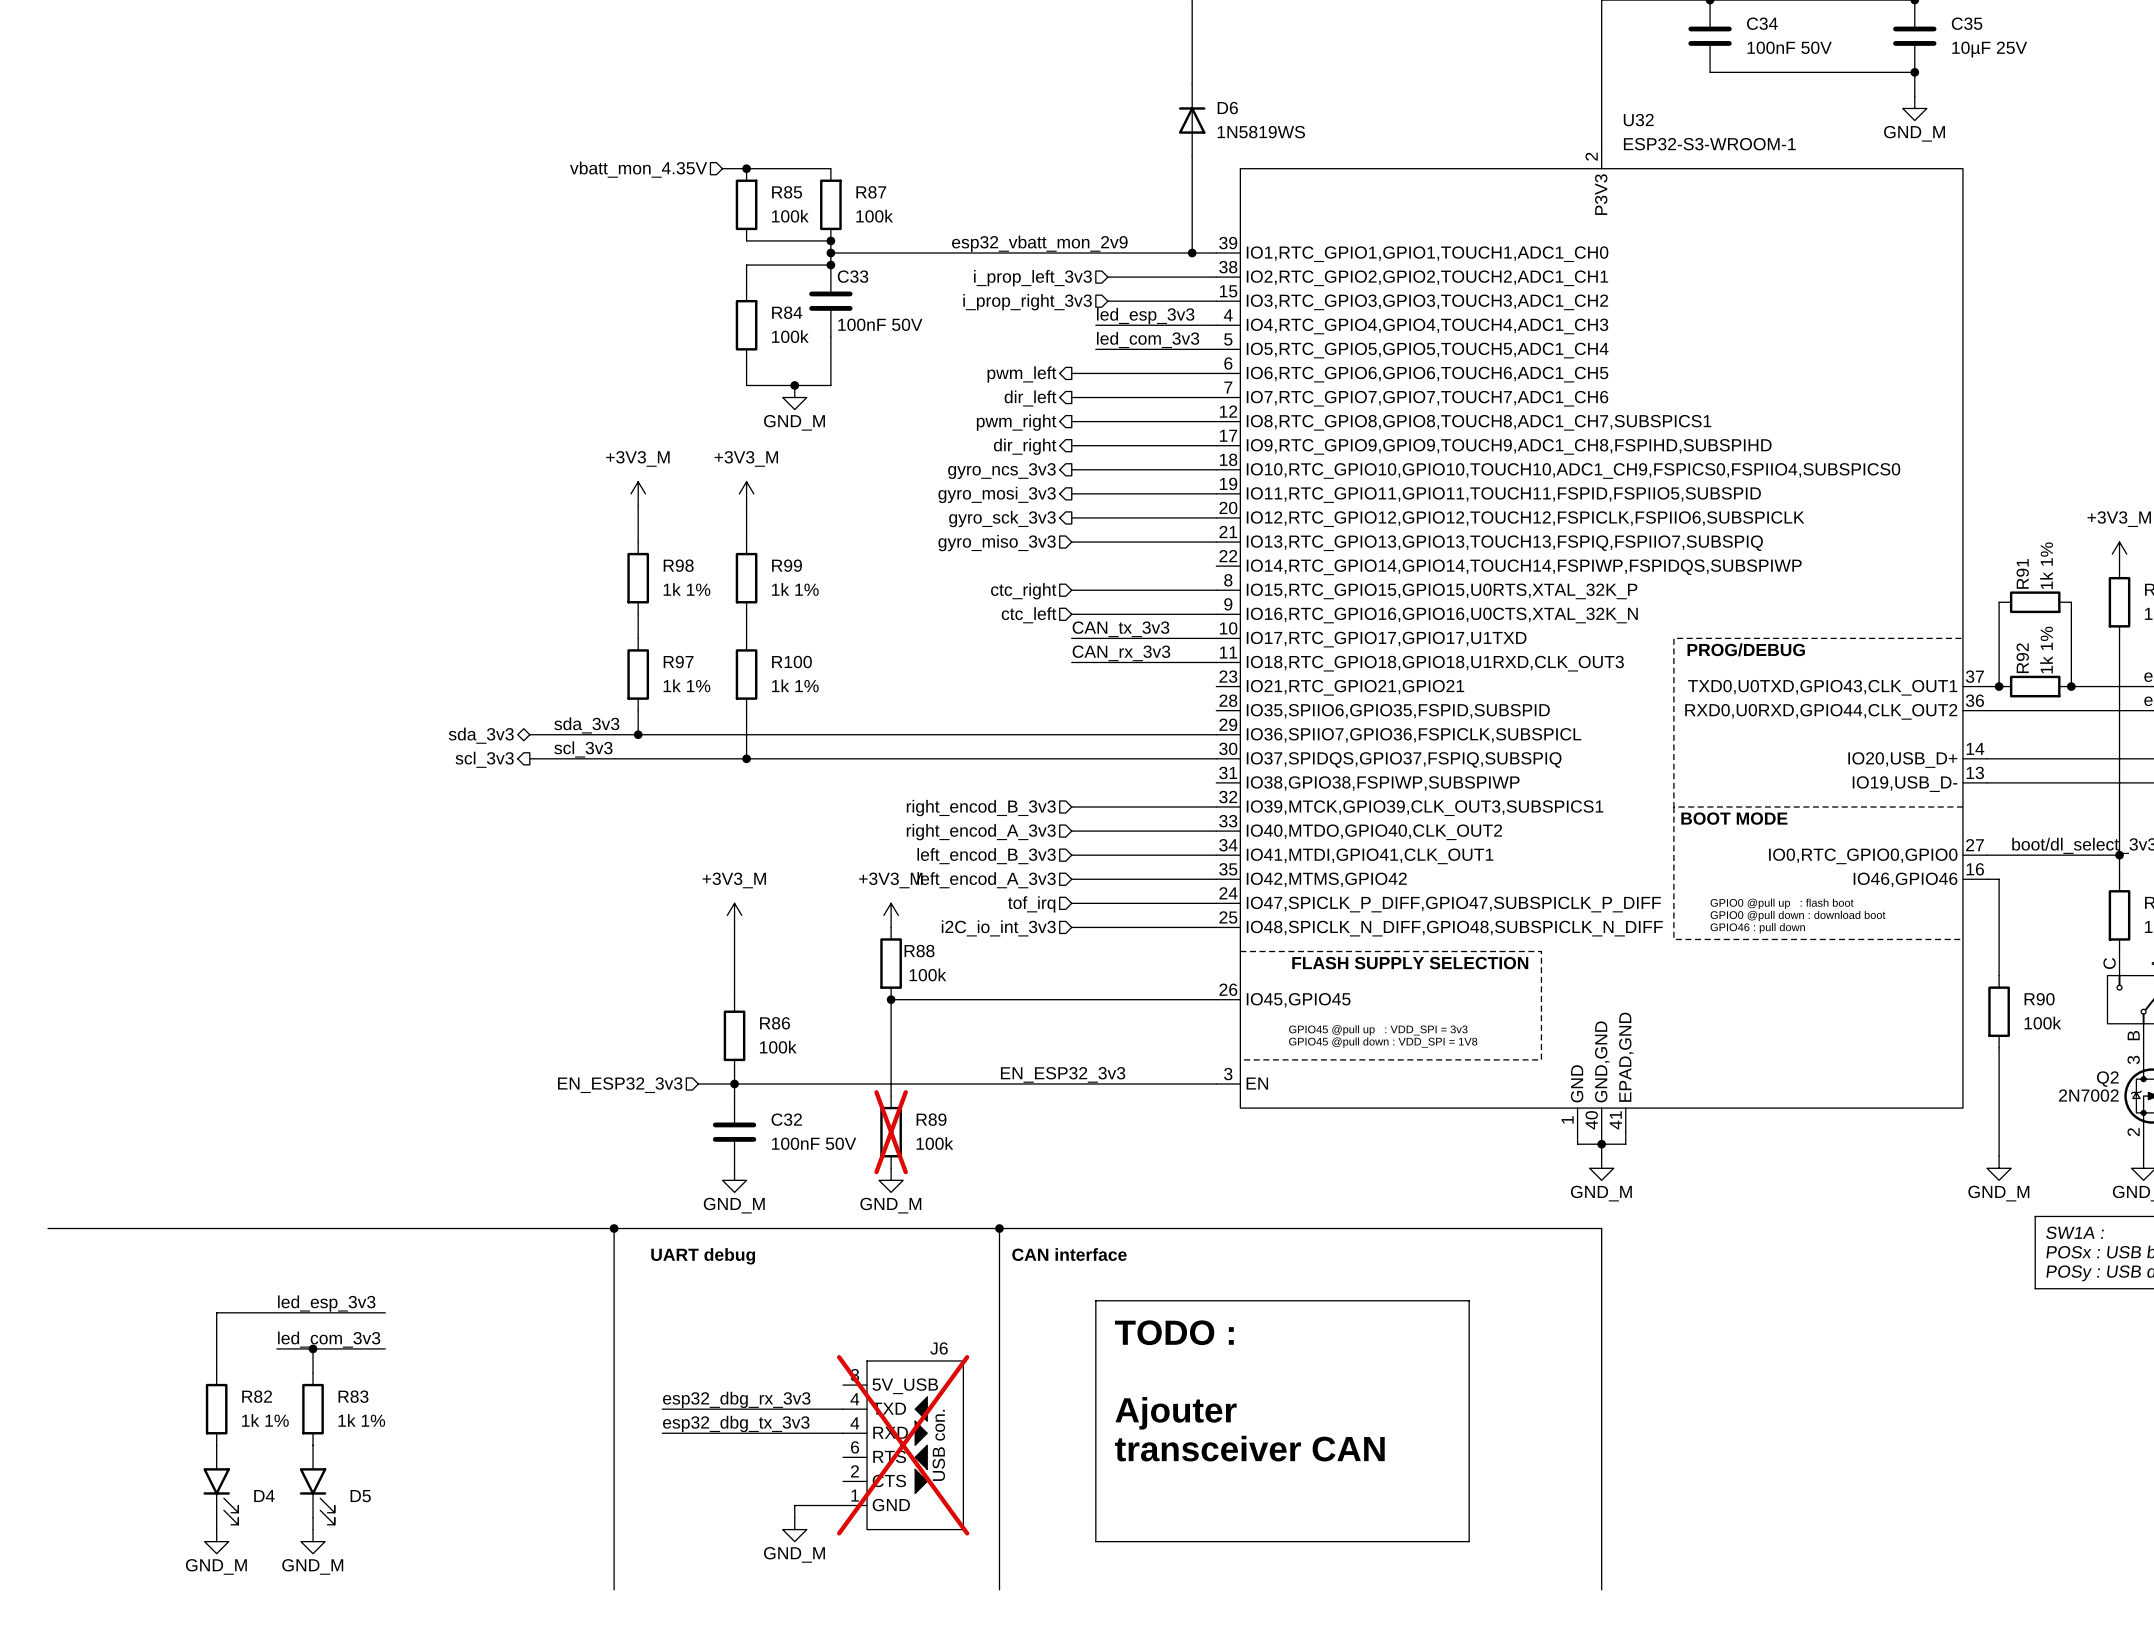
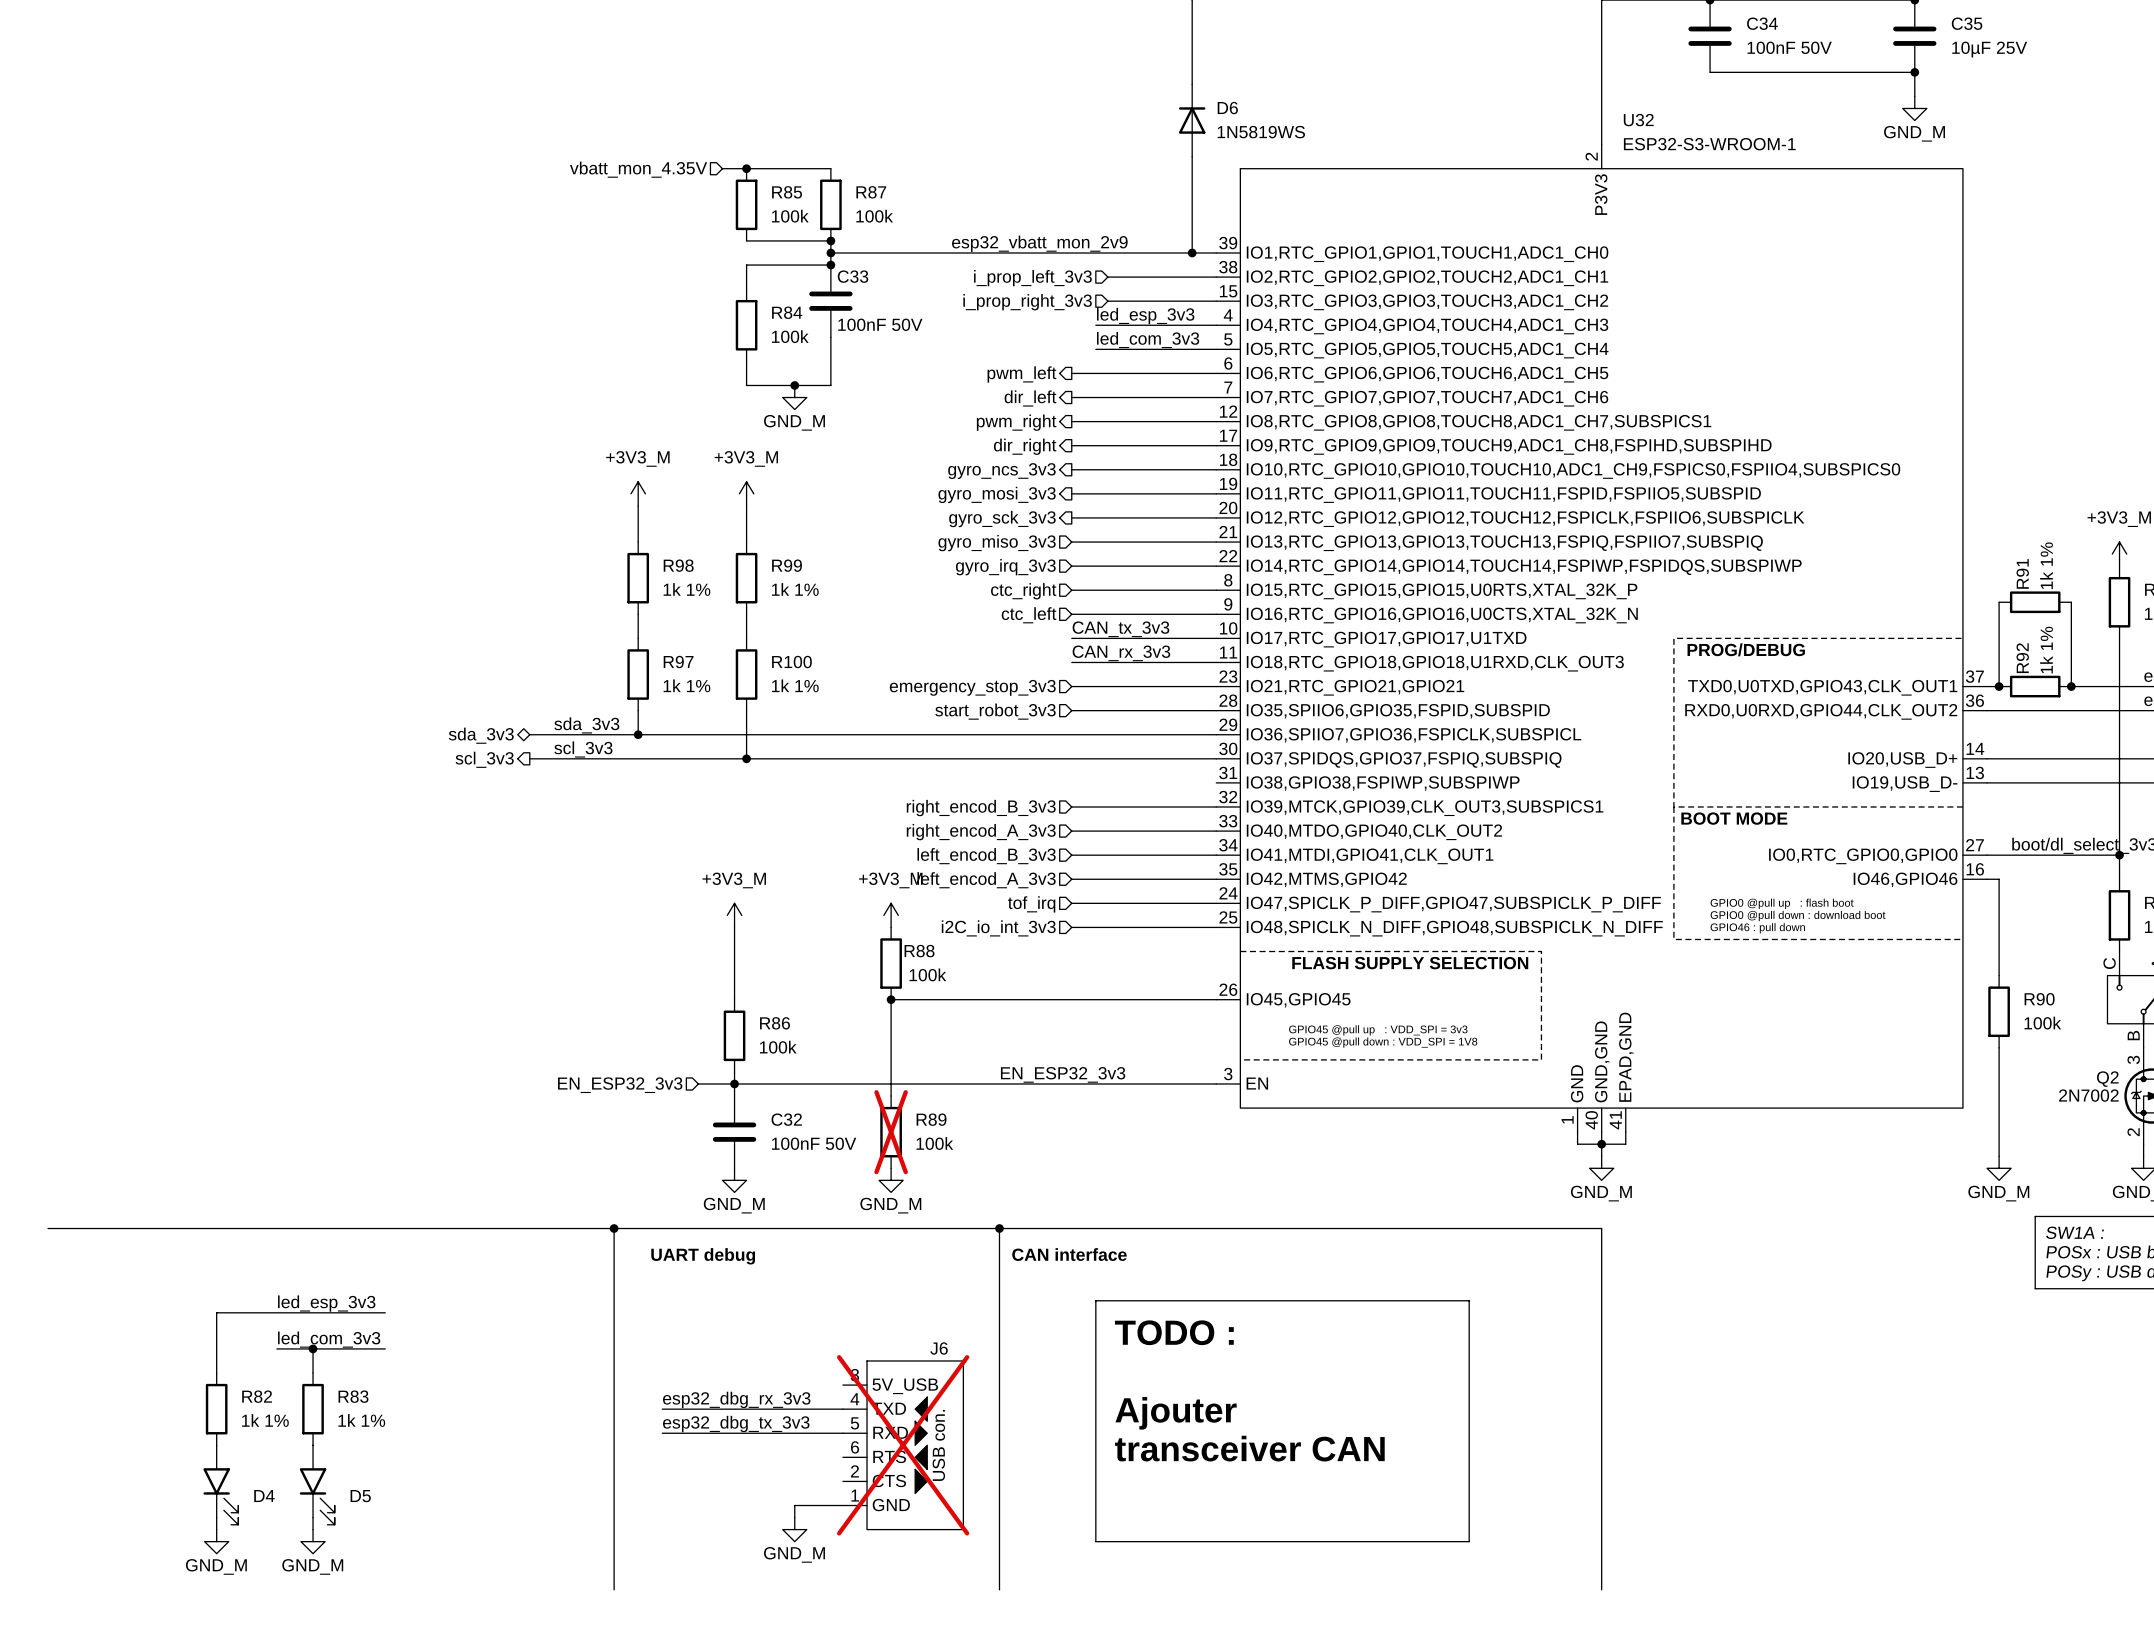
wire: none -> (1071, 566) (1216, 566)
hierarchical label: none -> gyro_irq_3v3 (1005, 567)
wire: none -> (1071, 686) (1216, 686)
hierarchical label: none -> emergency_stop_3v3 (972, 687)
wire: none -> (1071, 710) (1216, 710)
hierarchical label: none -> start_robot_3v3 (995, 711)
J6 pin number: 4 (854, 1423) -> 5 (854, 1423)

